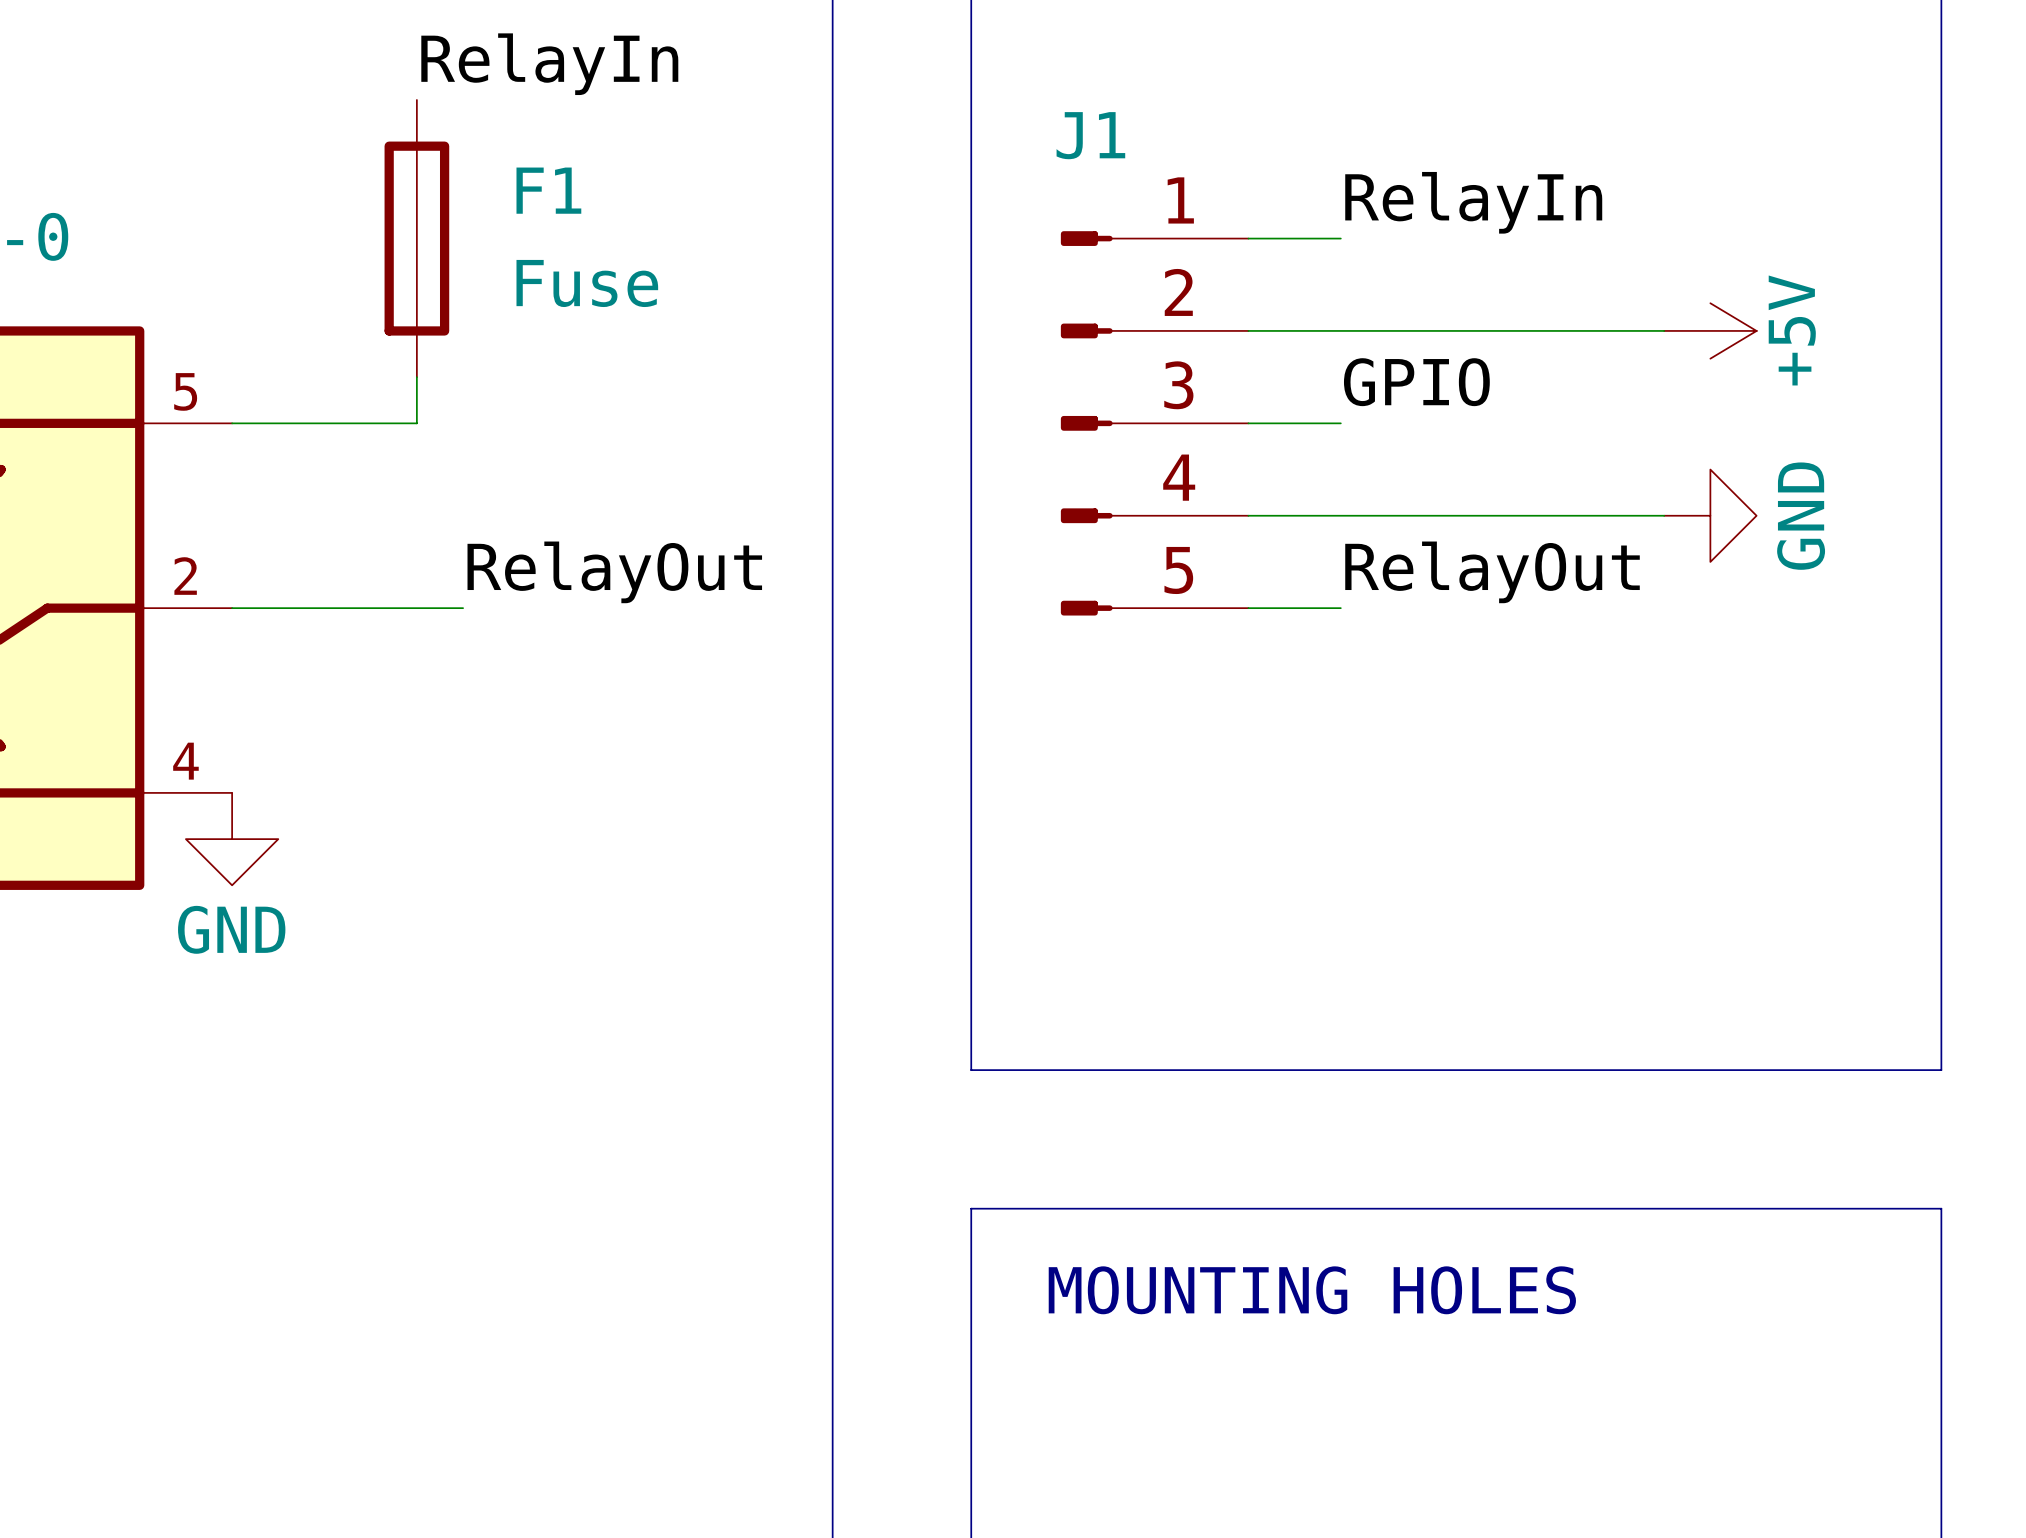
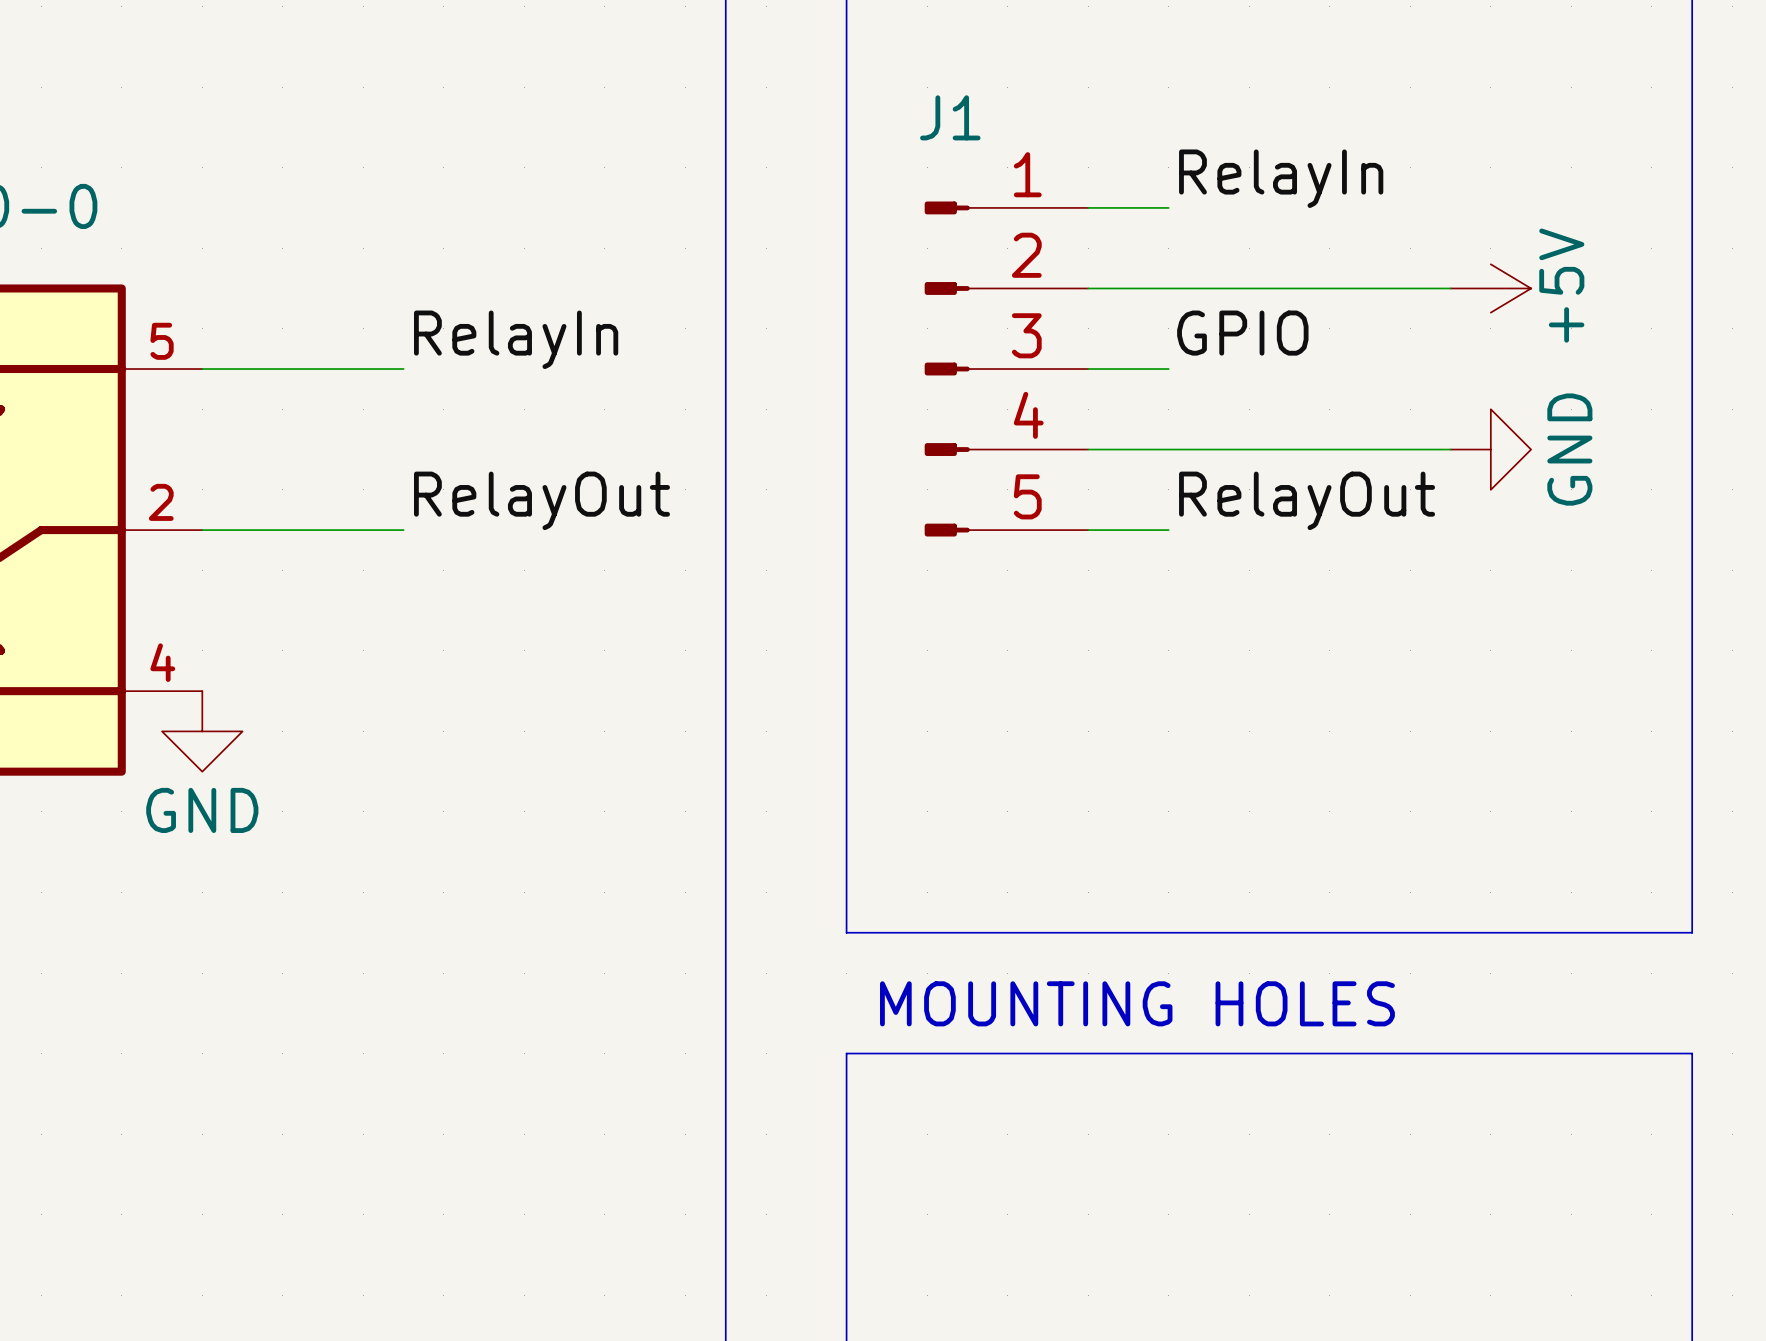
label position: RelayIn (549, 64) -> RelayIn (516, 339)
F1: Fuse (416, 238) -> none
wire: (416, 377) (416, 423) -> (403, 369) (363, 369)
text position: MOUNTING HOLES (1312, 1290) -> MOUNTING HOLES (1137, 1003)

